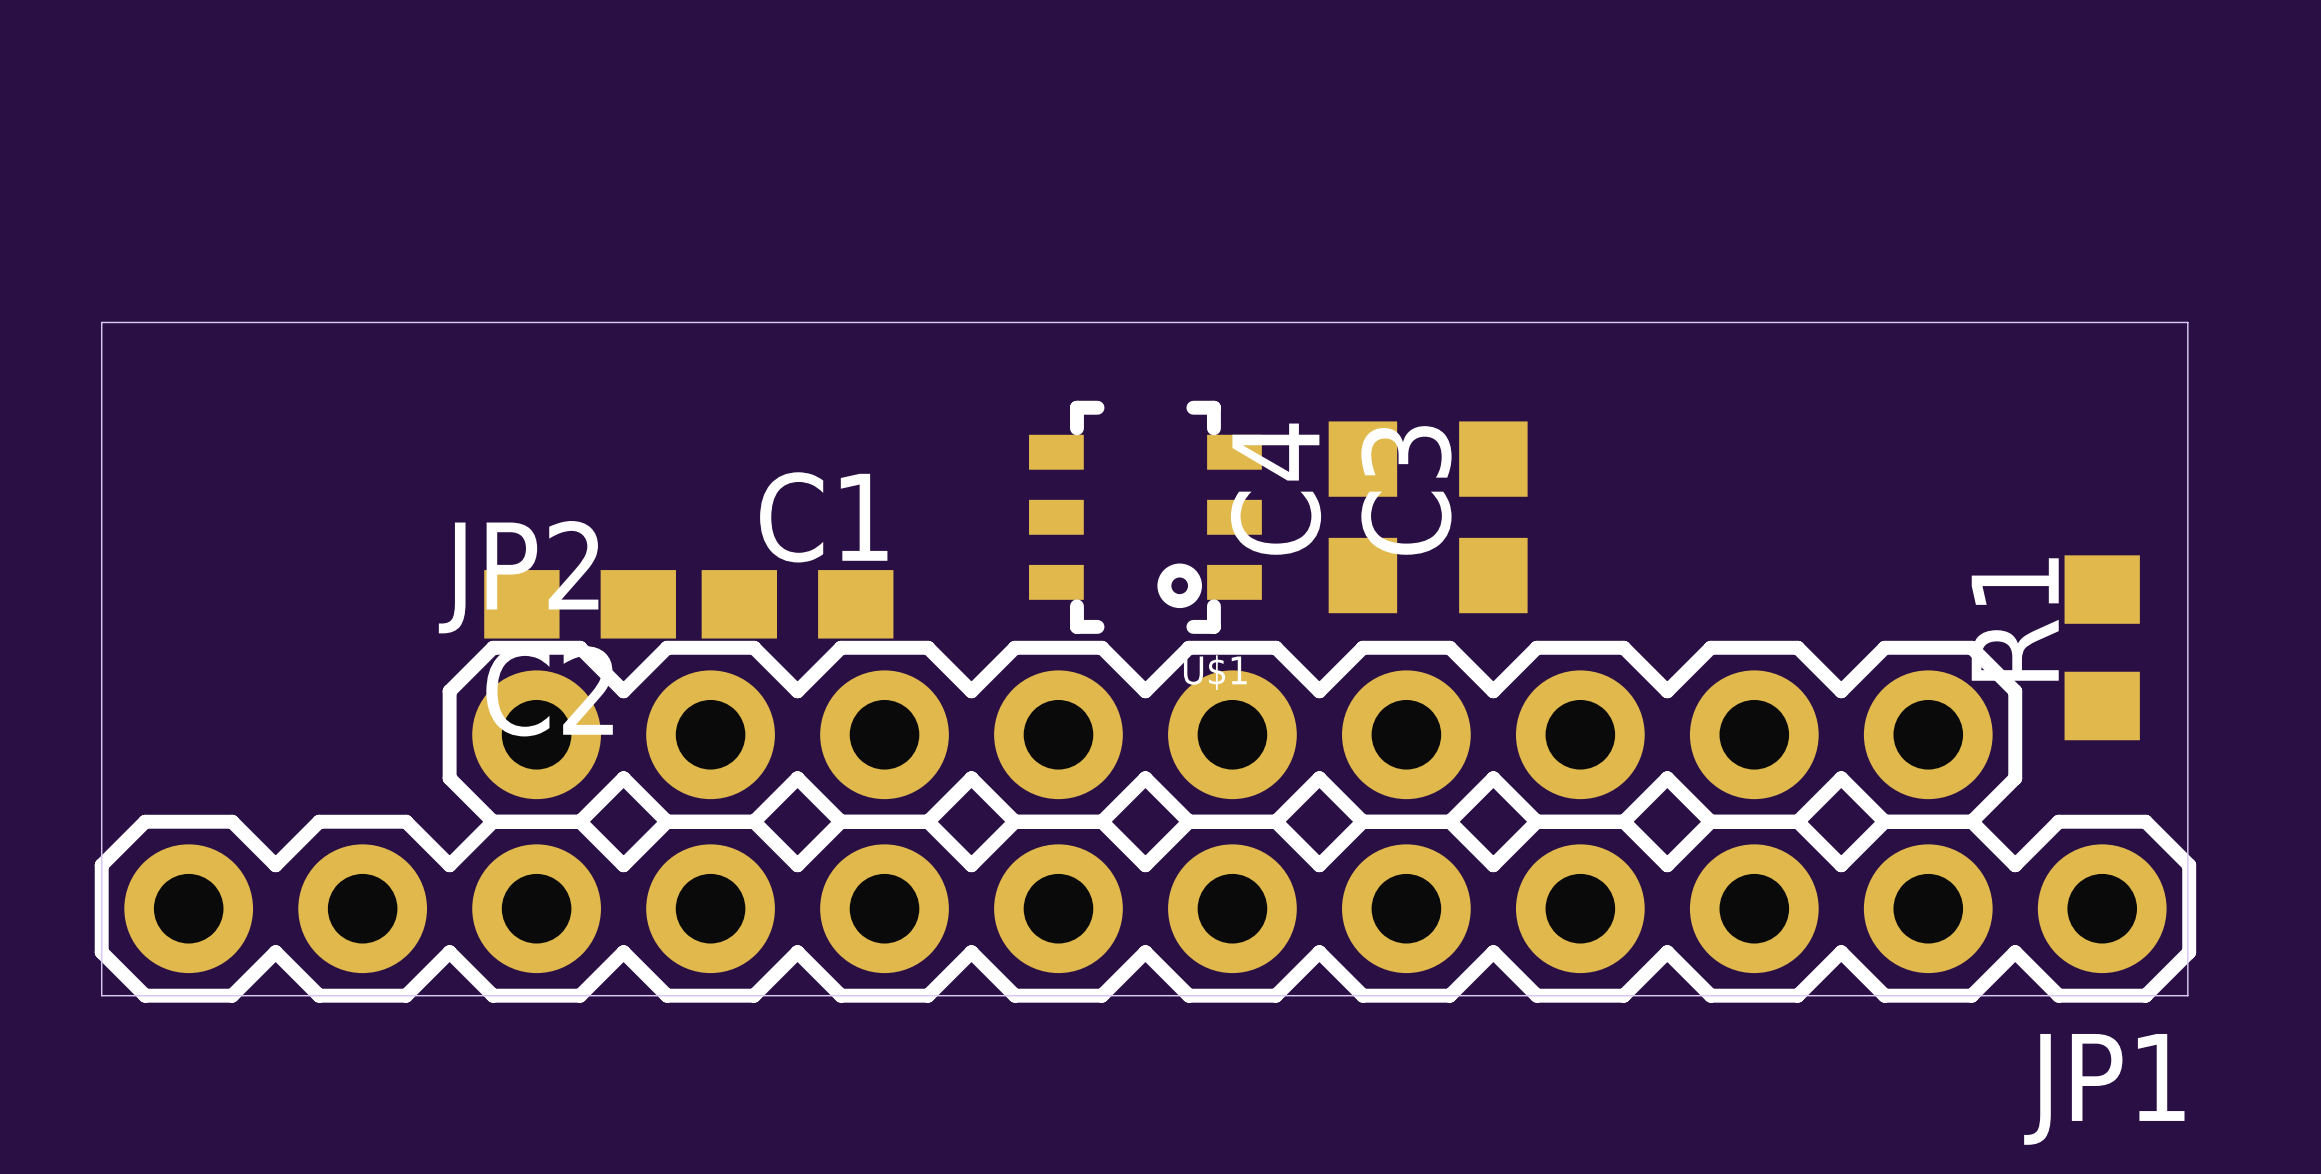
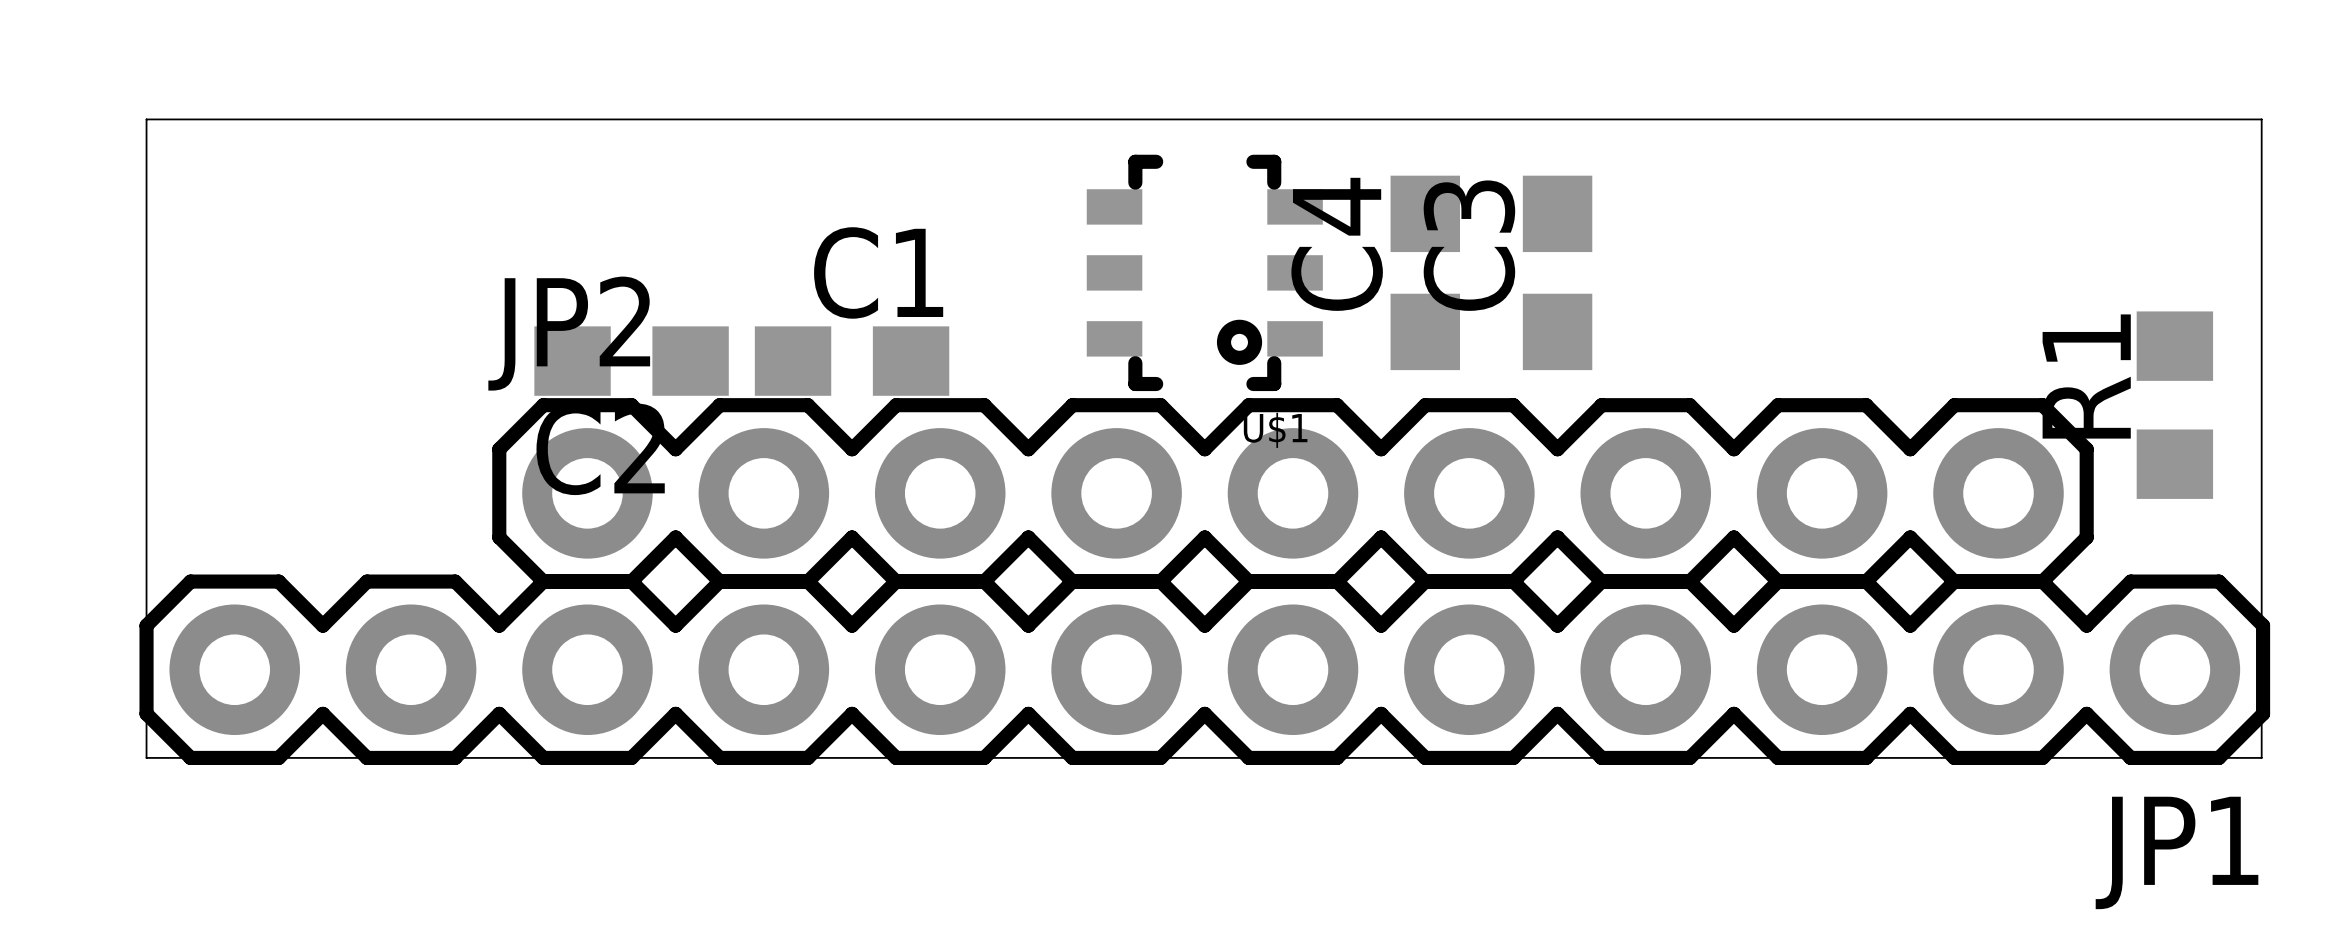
board edge: (101, 365) (101, 322) (2187, 322) (2187, 365) -> (146, 119) (2261, 119)

